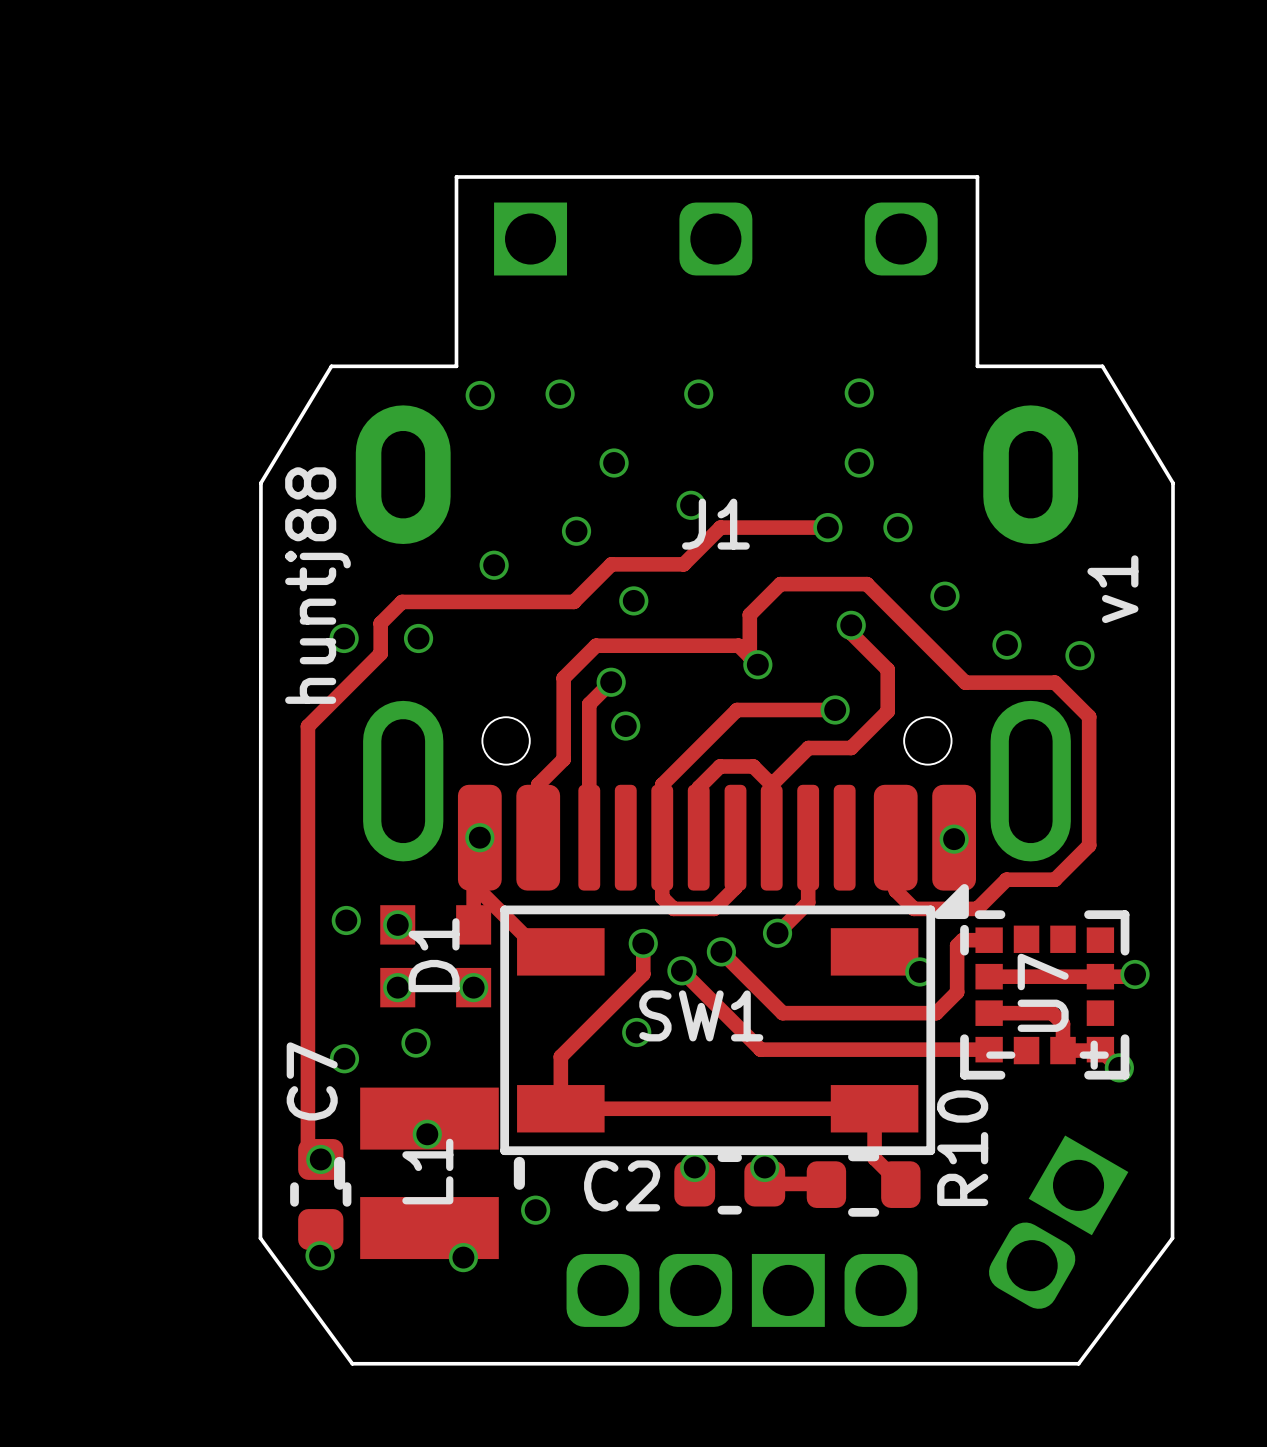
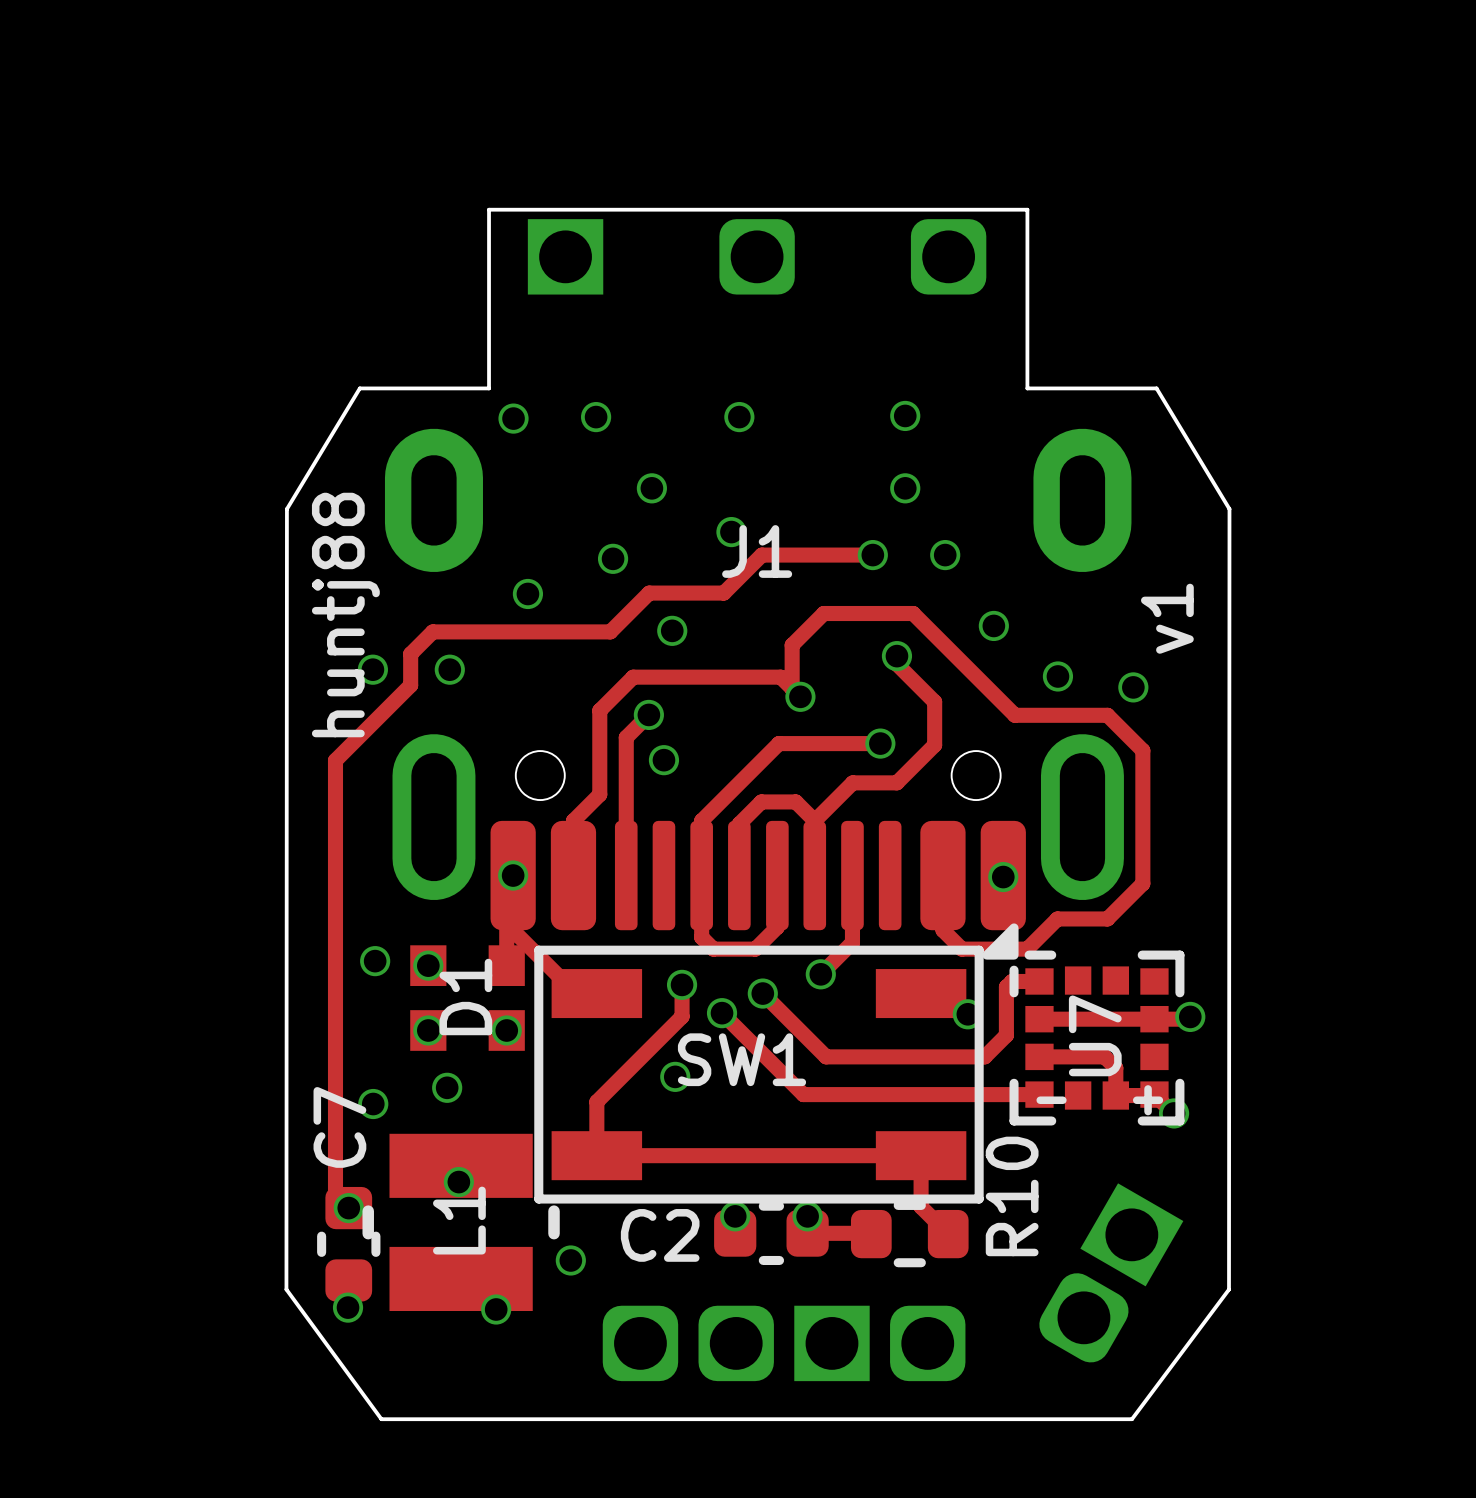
board edge: (456, 193) (456, 176) (977, 176) (977, 193) -> (489, 209) (1027, 209)

